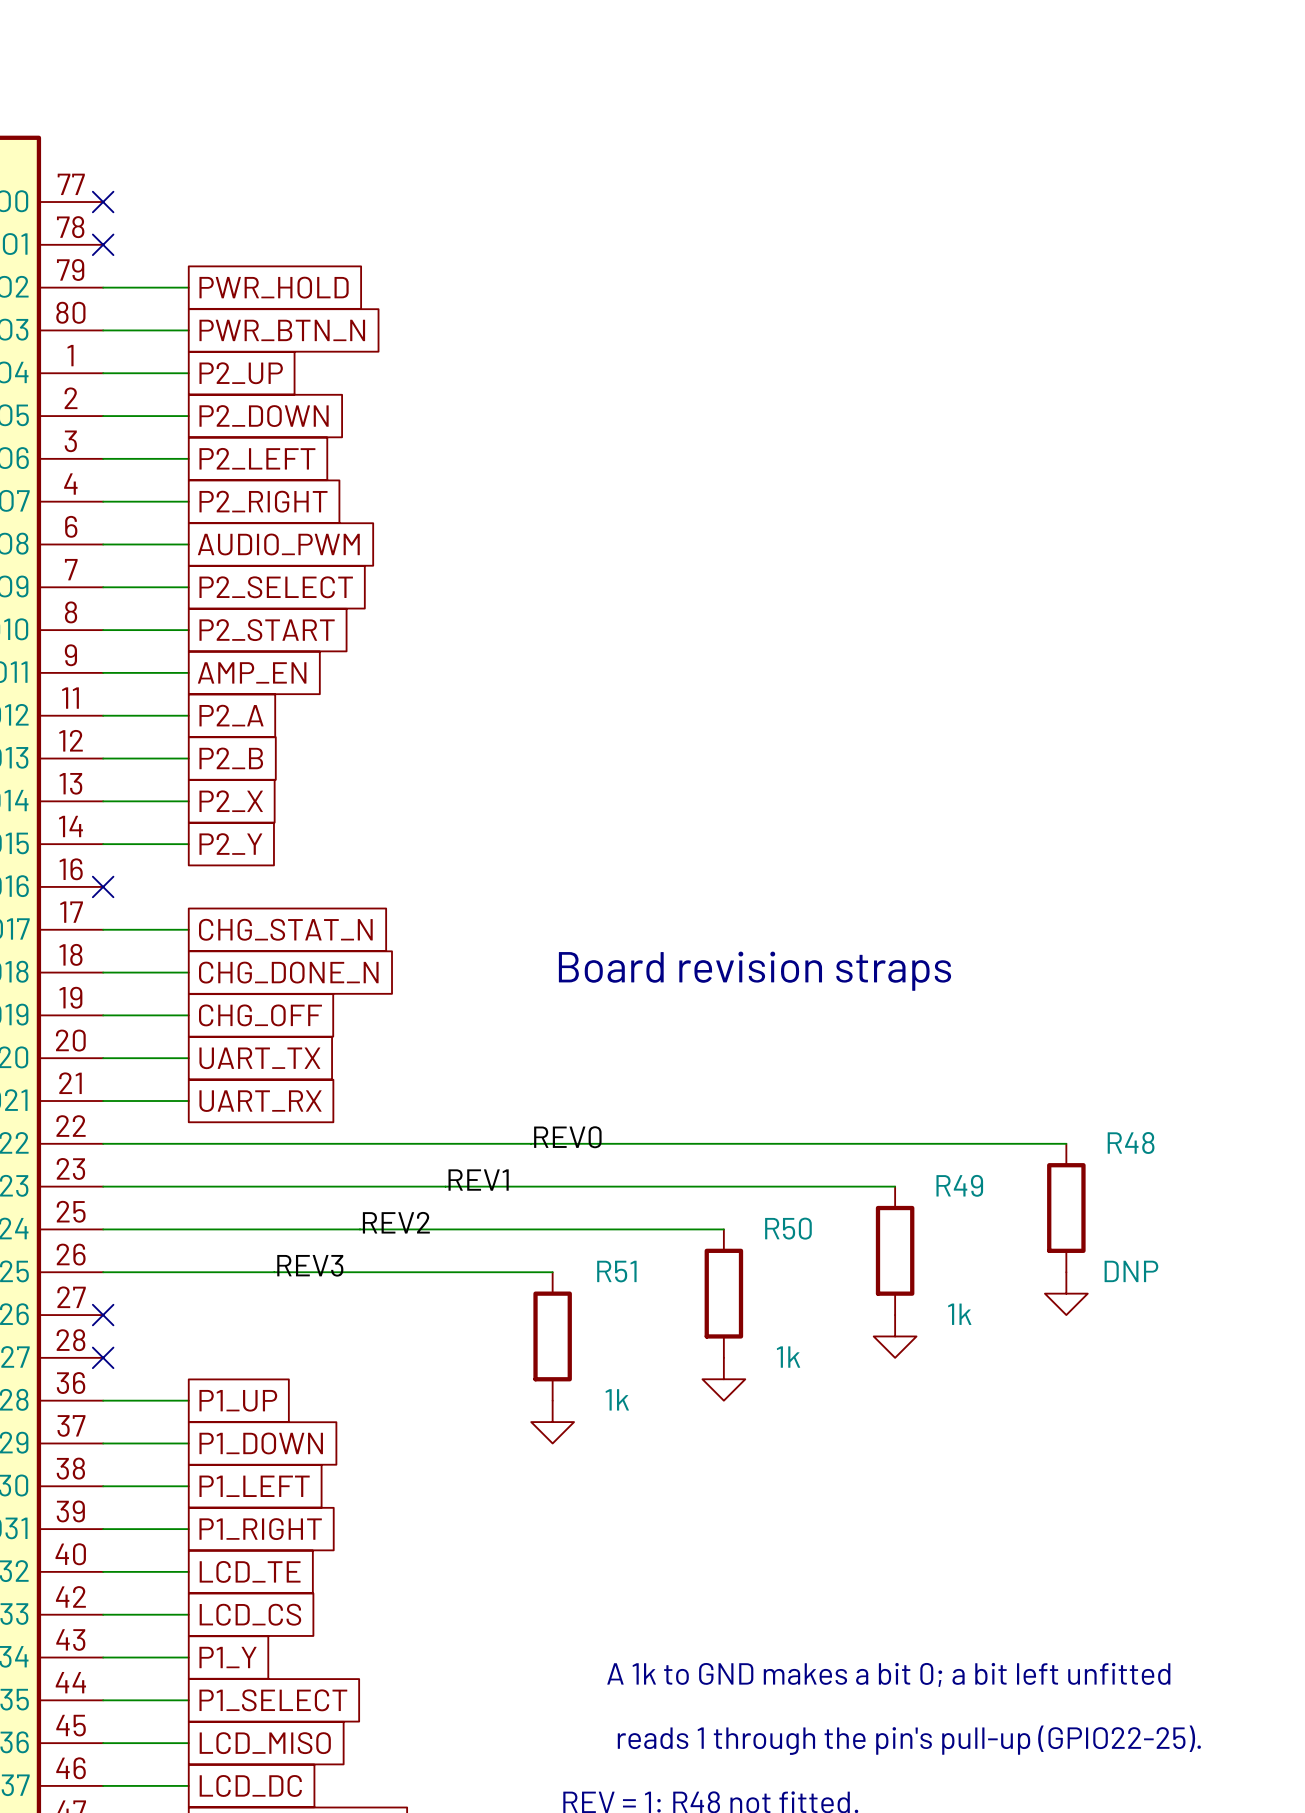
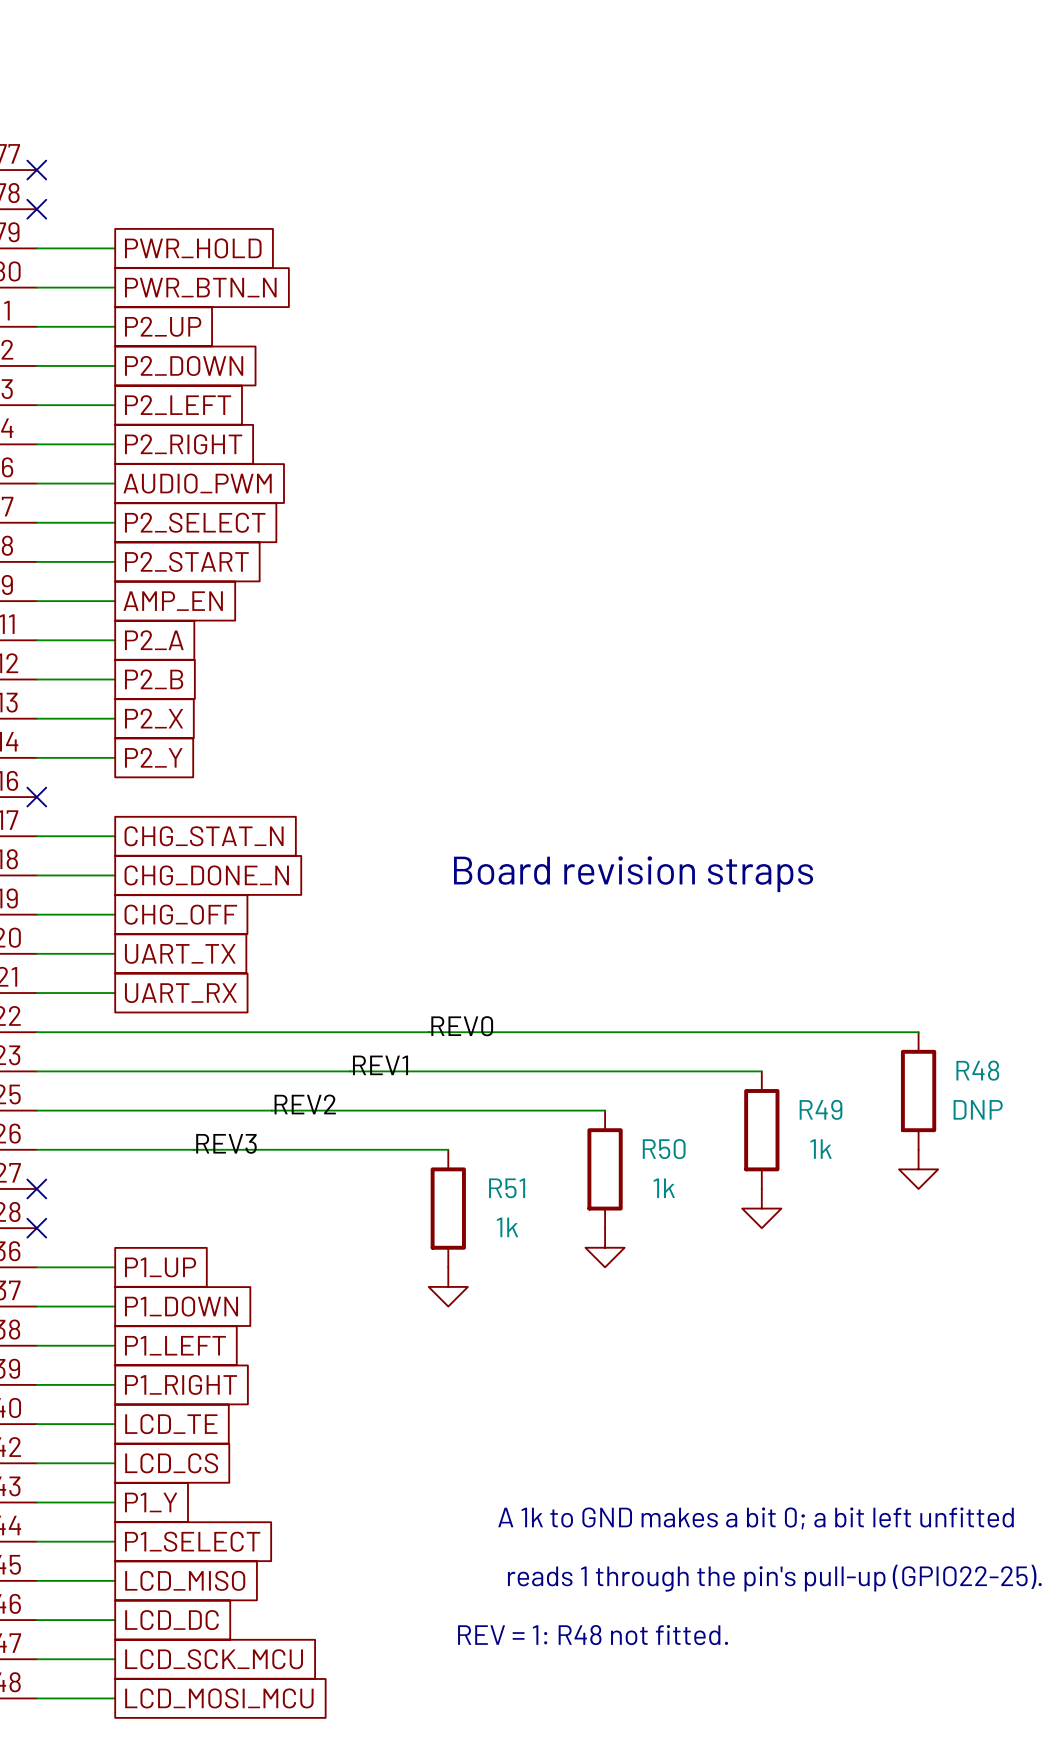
R48 name position: R48 (1131, 1142) -> R48 (977, 1070)
R49 name position: R49 (959, 1185) -> R49 (821, 1109)
R50 name position: R50 (788, 1228) -> R50 (664, 1149)
R51 name position: R51 (616, 1271) -> R51 (507, 1188)
R48 value position: DNP (1131, 1271) -> DNP (978, 1109)
R49 value position: 1k (959, 1314) -> 1k (820, 1149)
R50 value position: 1k (788, 1357) -> 1k (664, 1188)
R51 value position: 1k (617, 1399) -> 1k (507, 1227)

